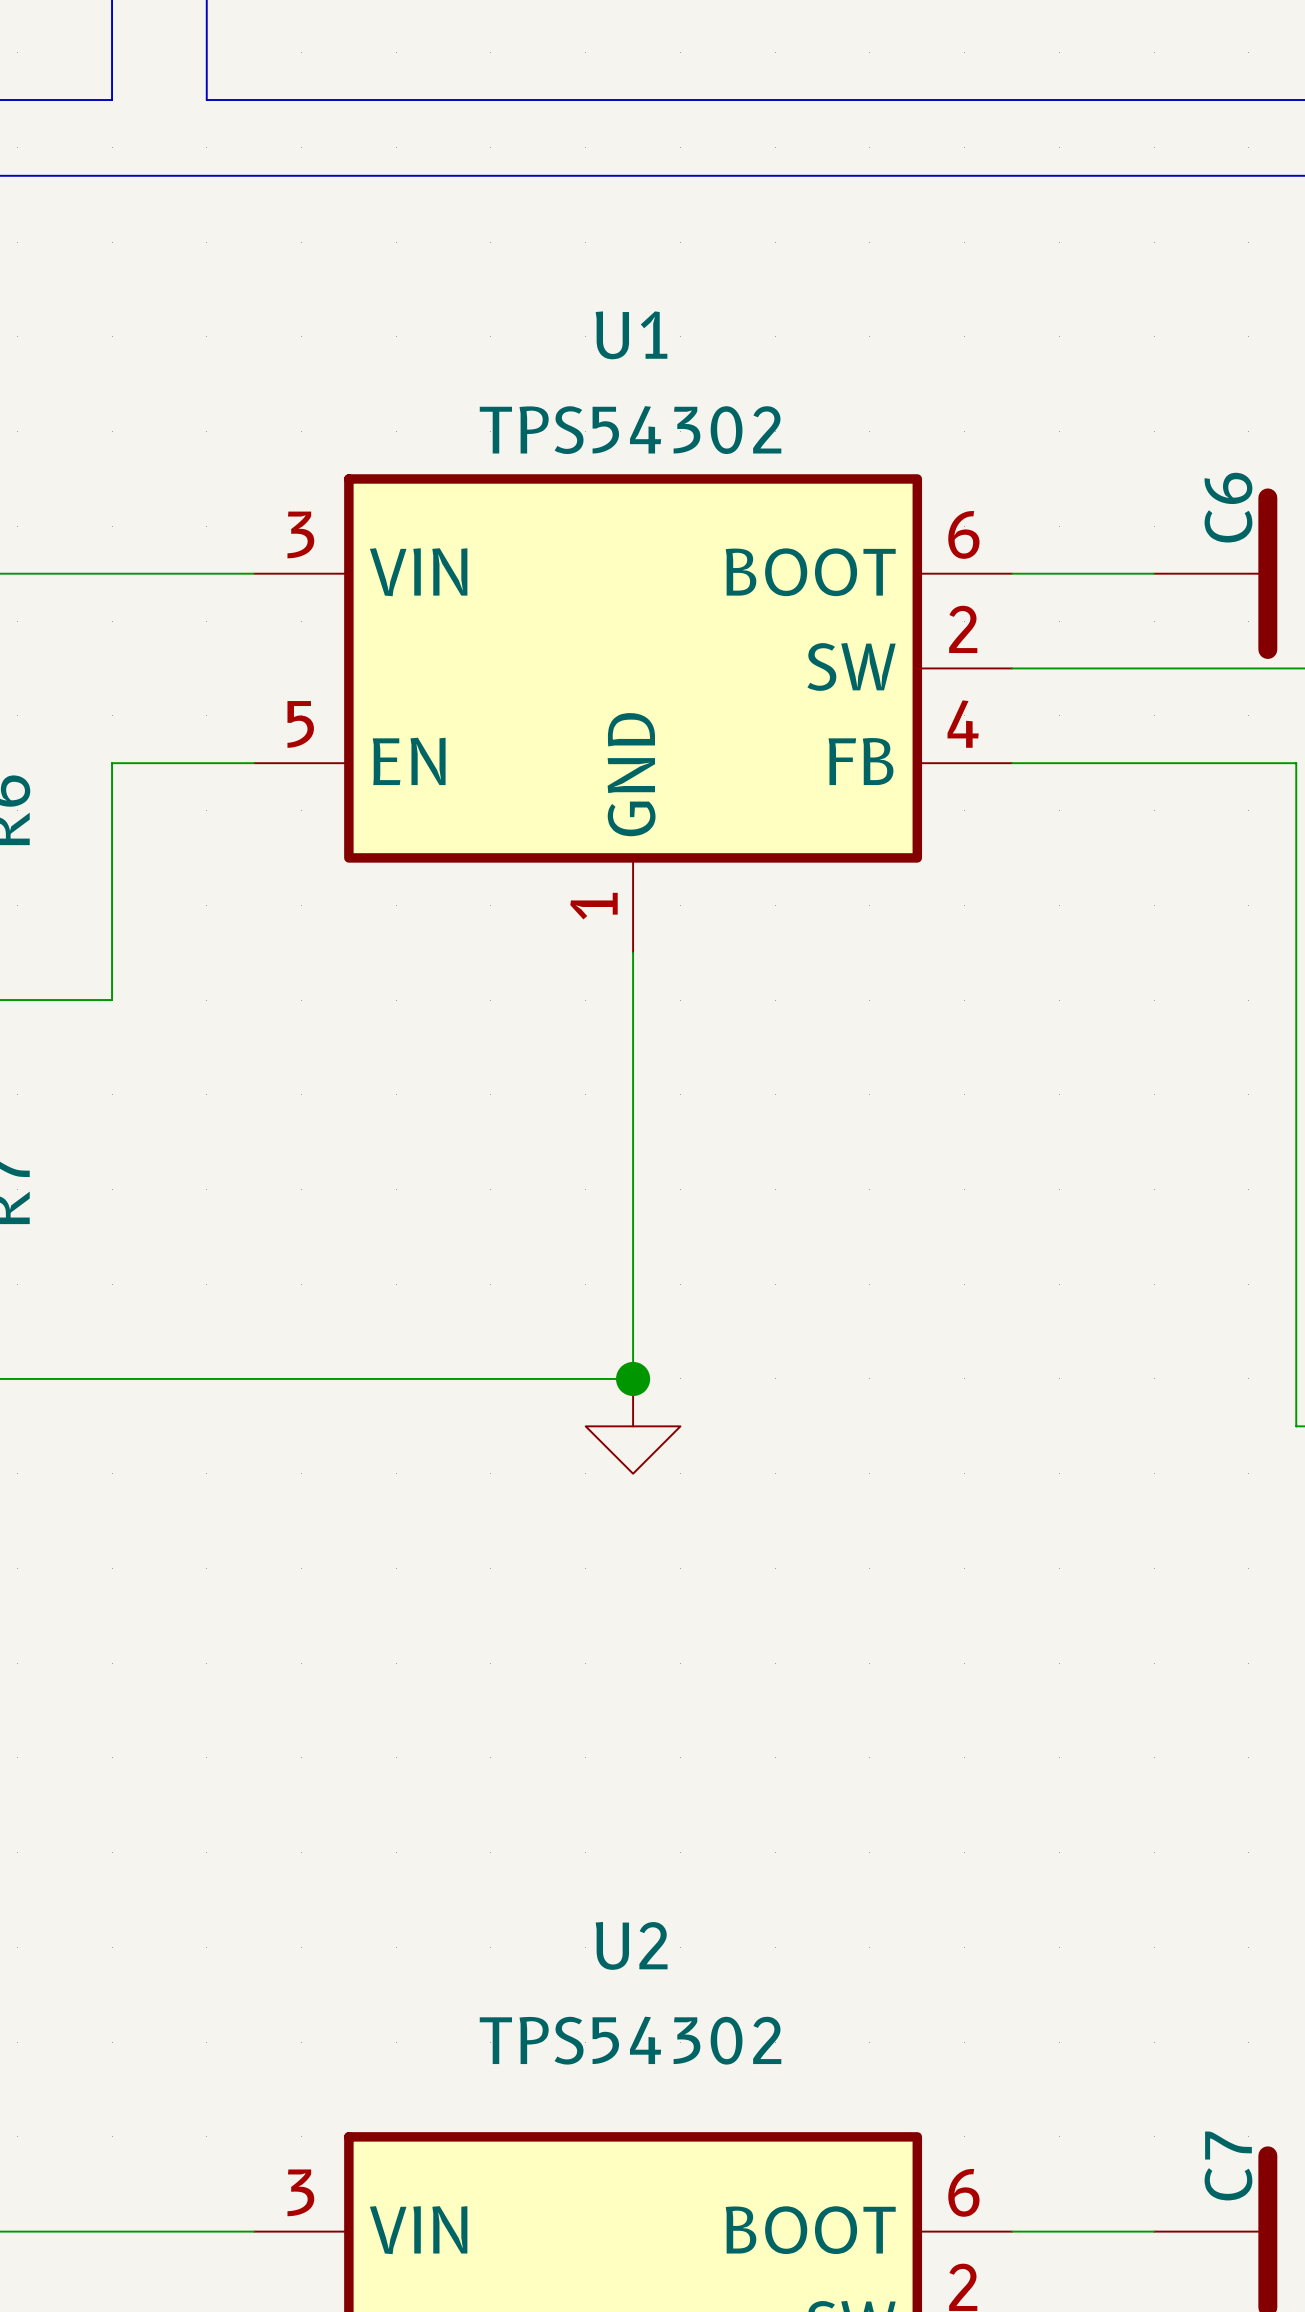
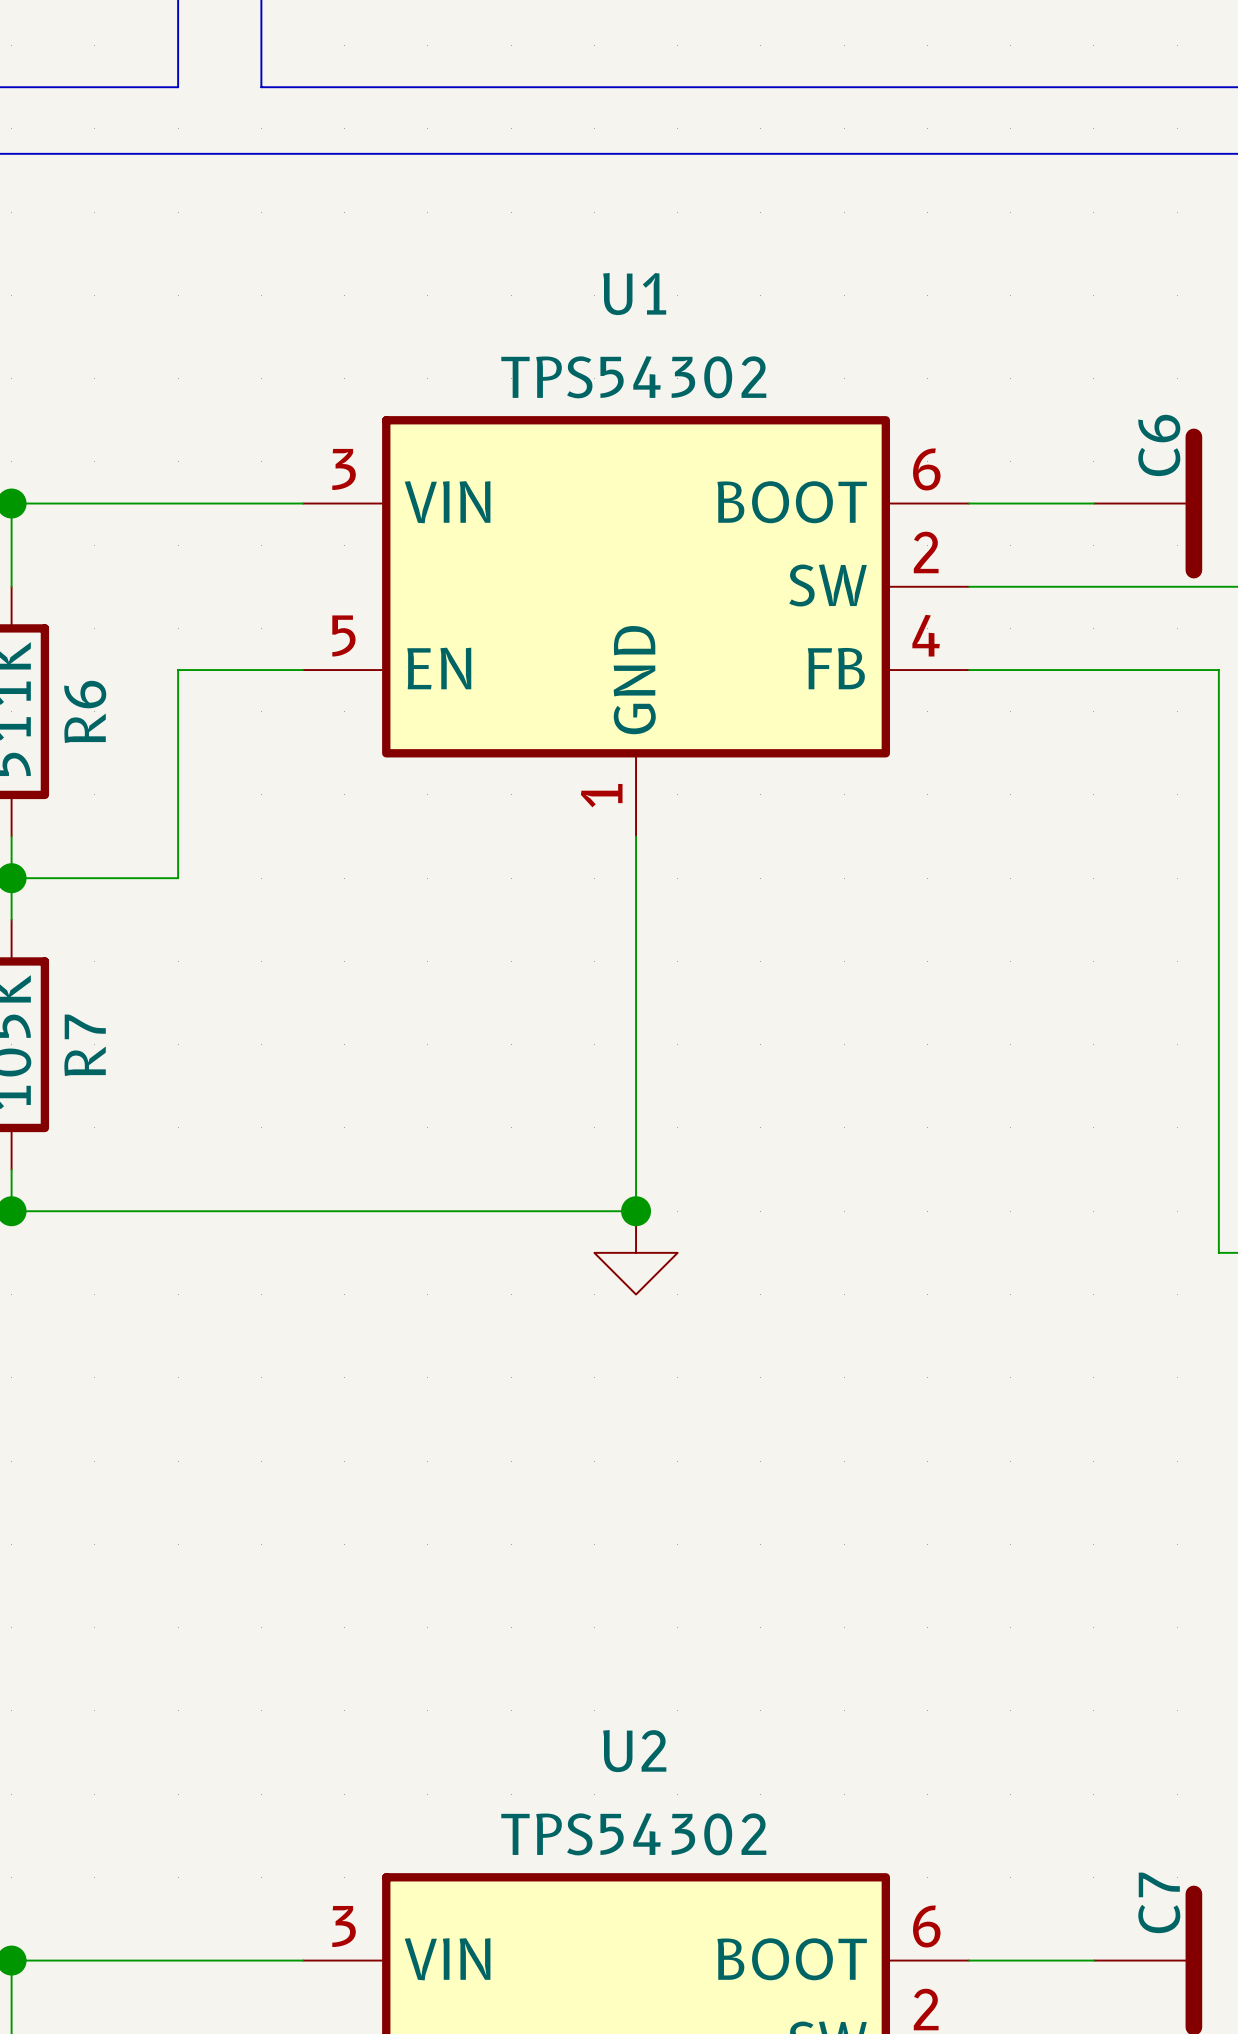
U2 name position: U2 (631, 1945) -> U2 (634, 1751)
U2 value position: TPS54302 (630, 2040) -> TPS54302 (633, 1834)

